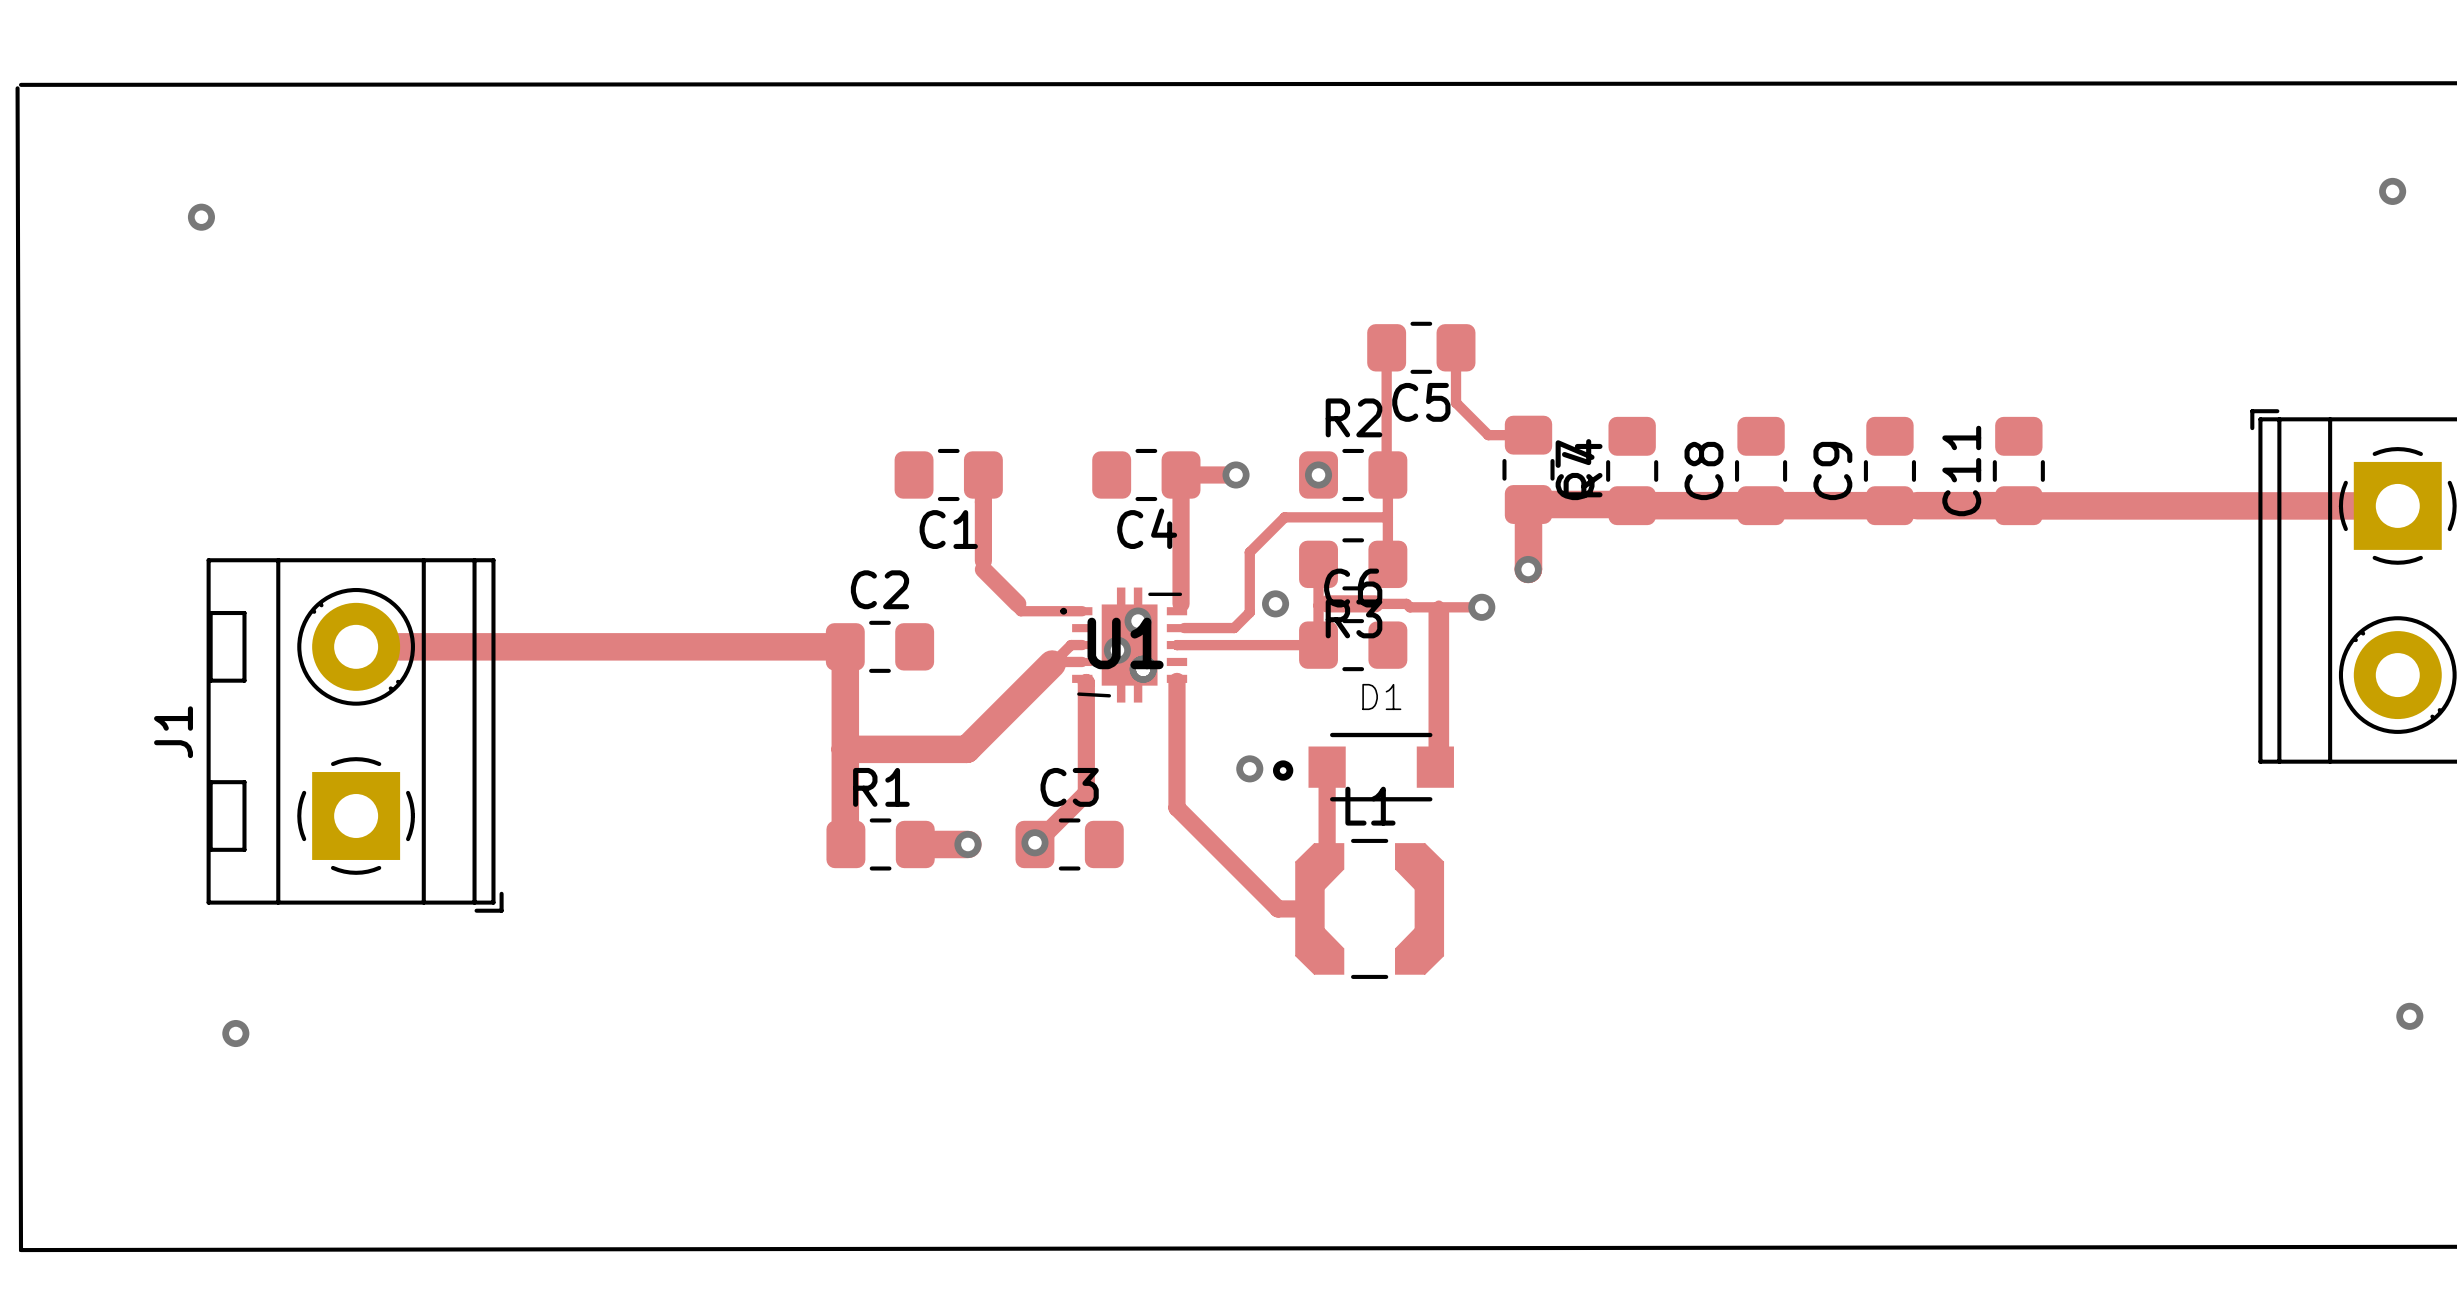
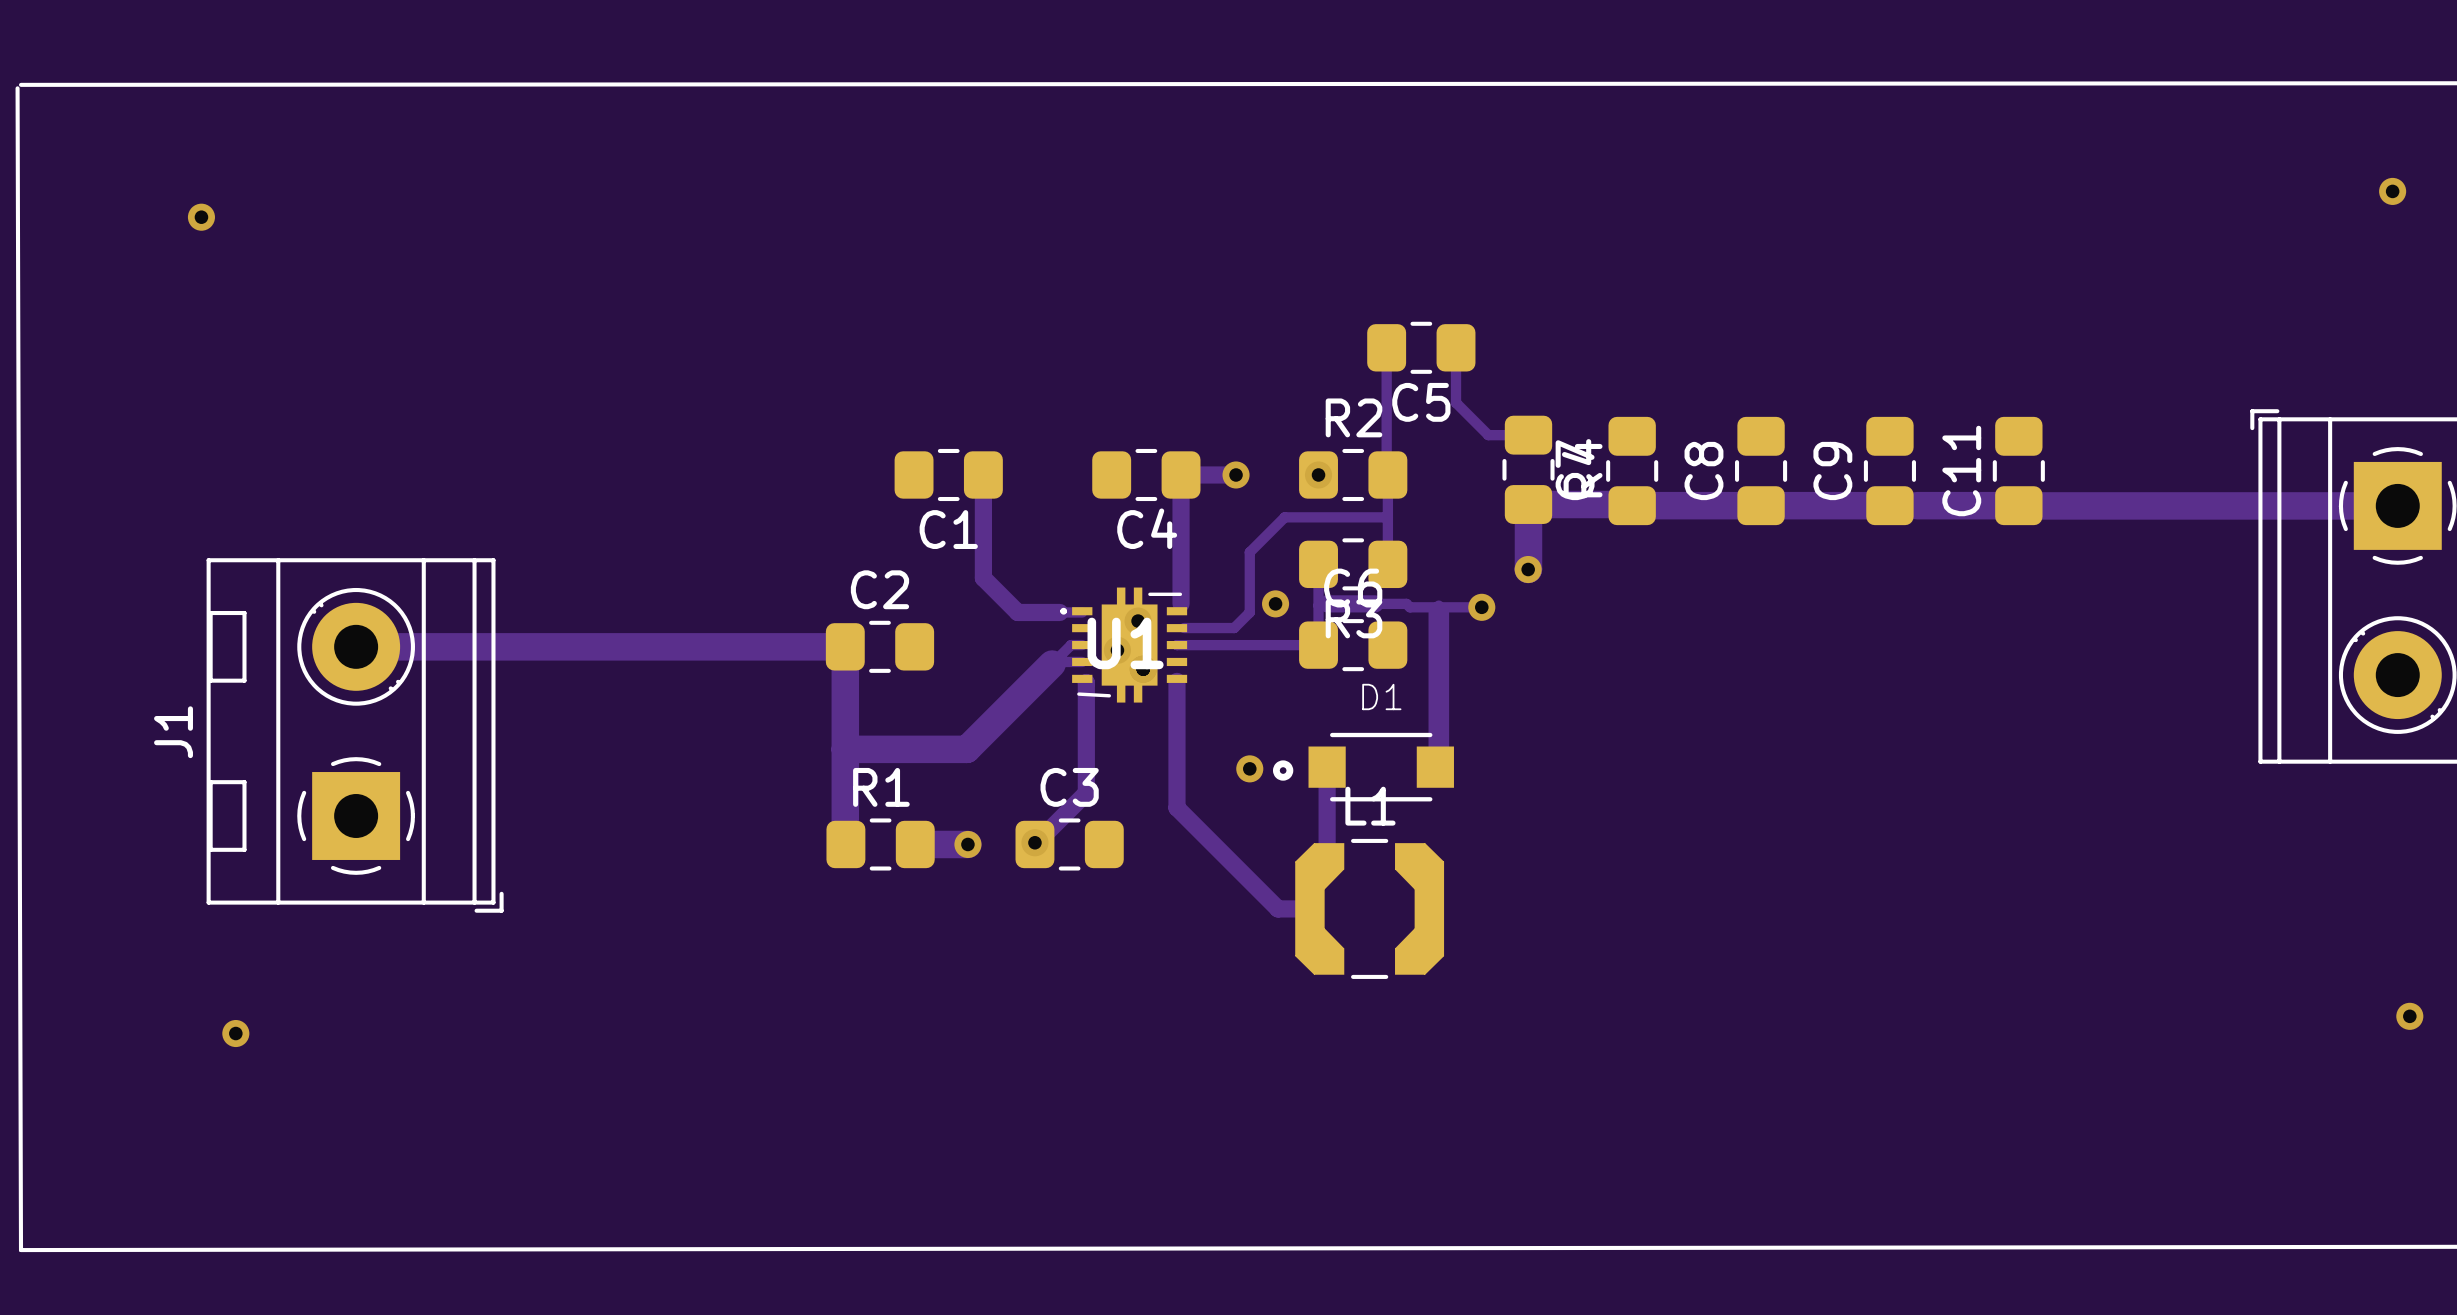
track: (983, 569) (1017, 603) -> none
track: (1017, 608) (1020, 611) (1082, 611) -> (983, 560) (983, 578) (1017, 612) (1082, 612)

